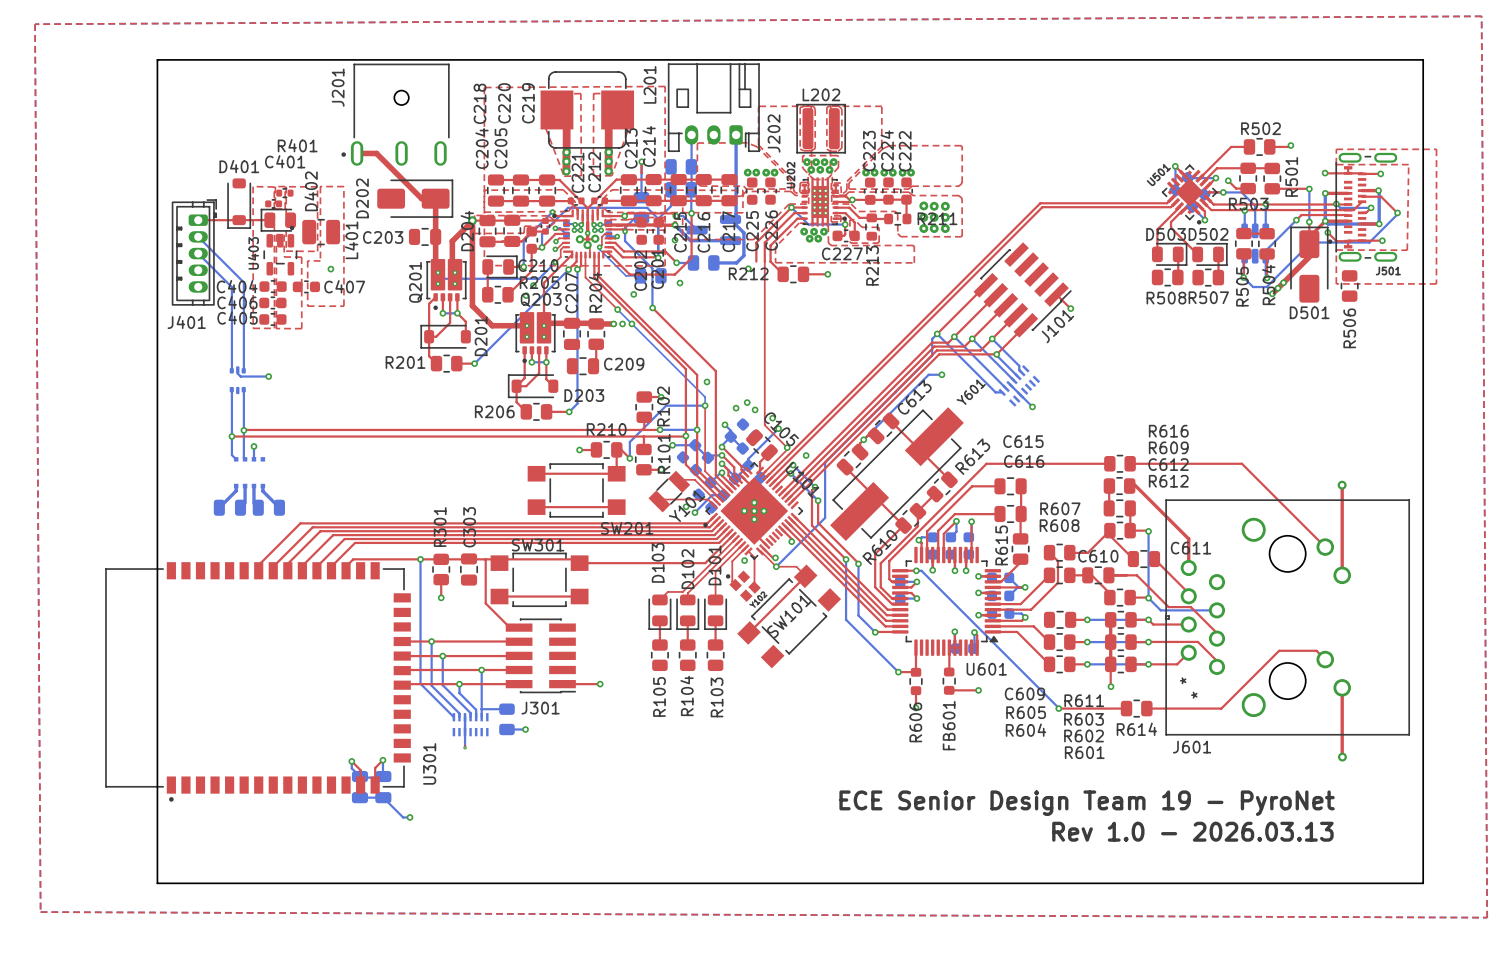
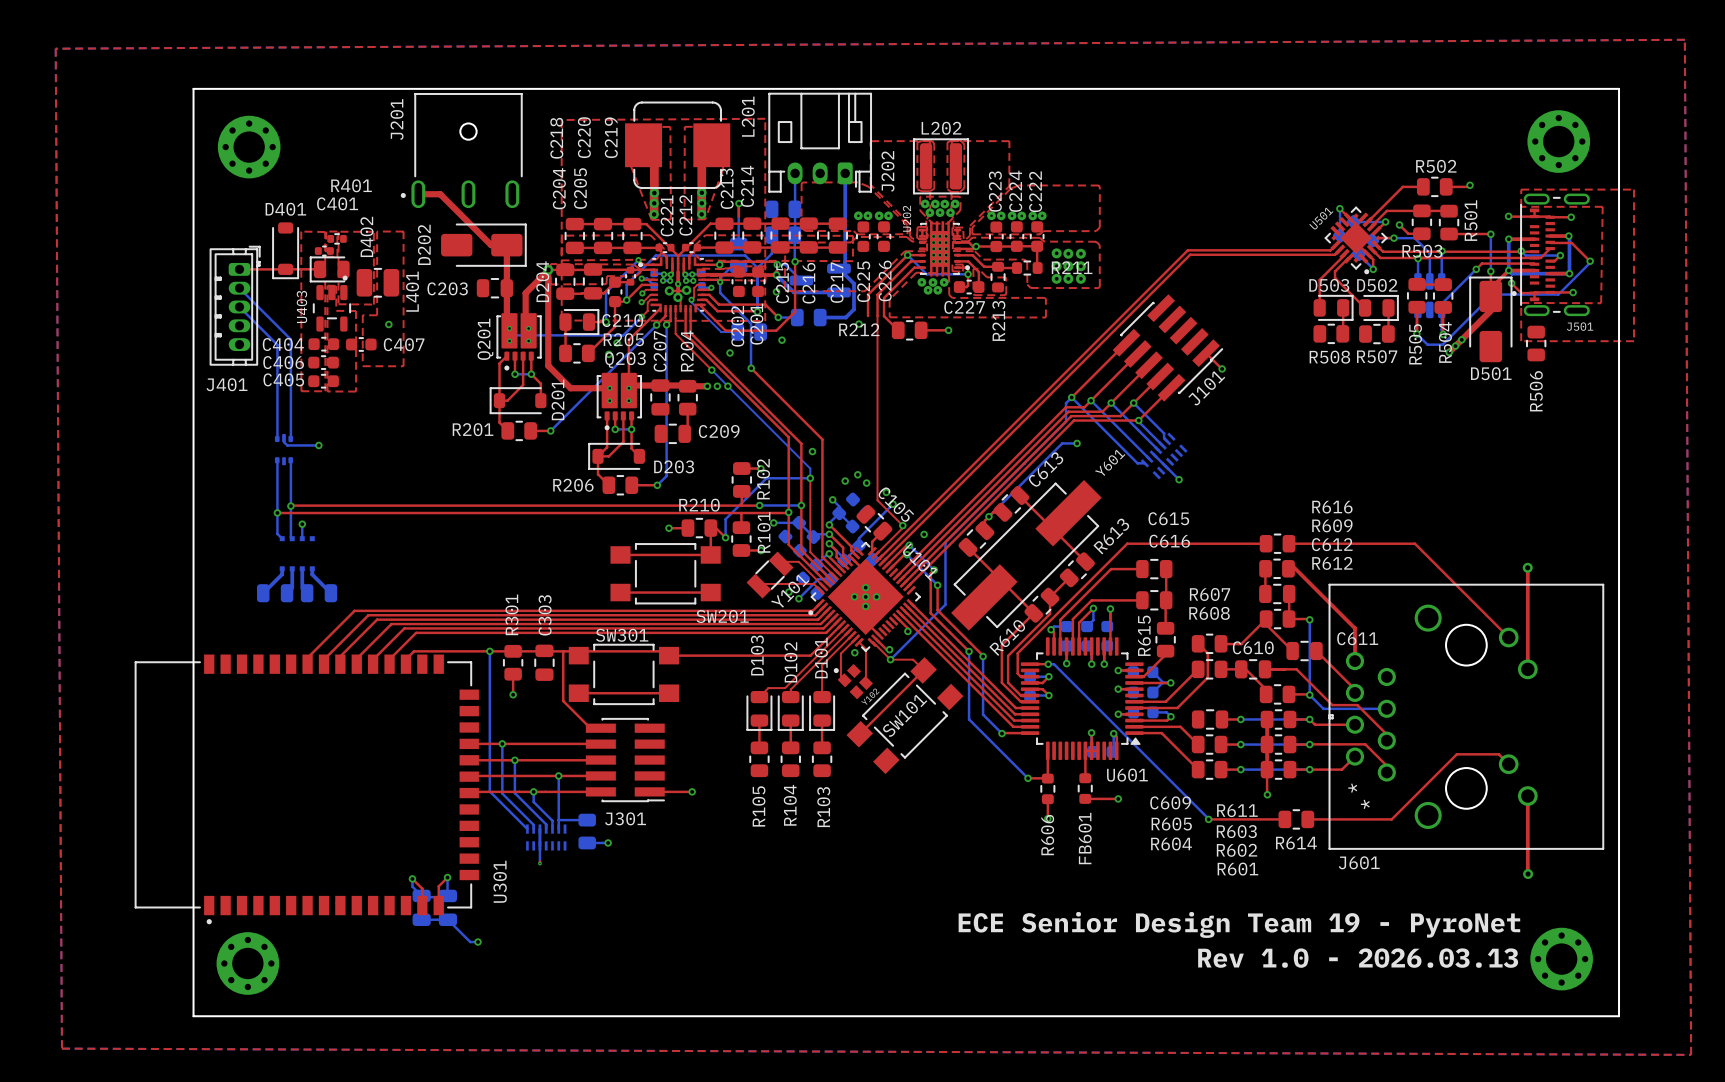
part: none -> (1558, 141)
part: none -> (249, 147)
part: none -> (1561, 959)
part: none -> (247, 963)

